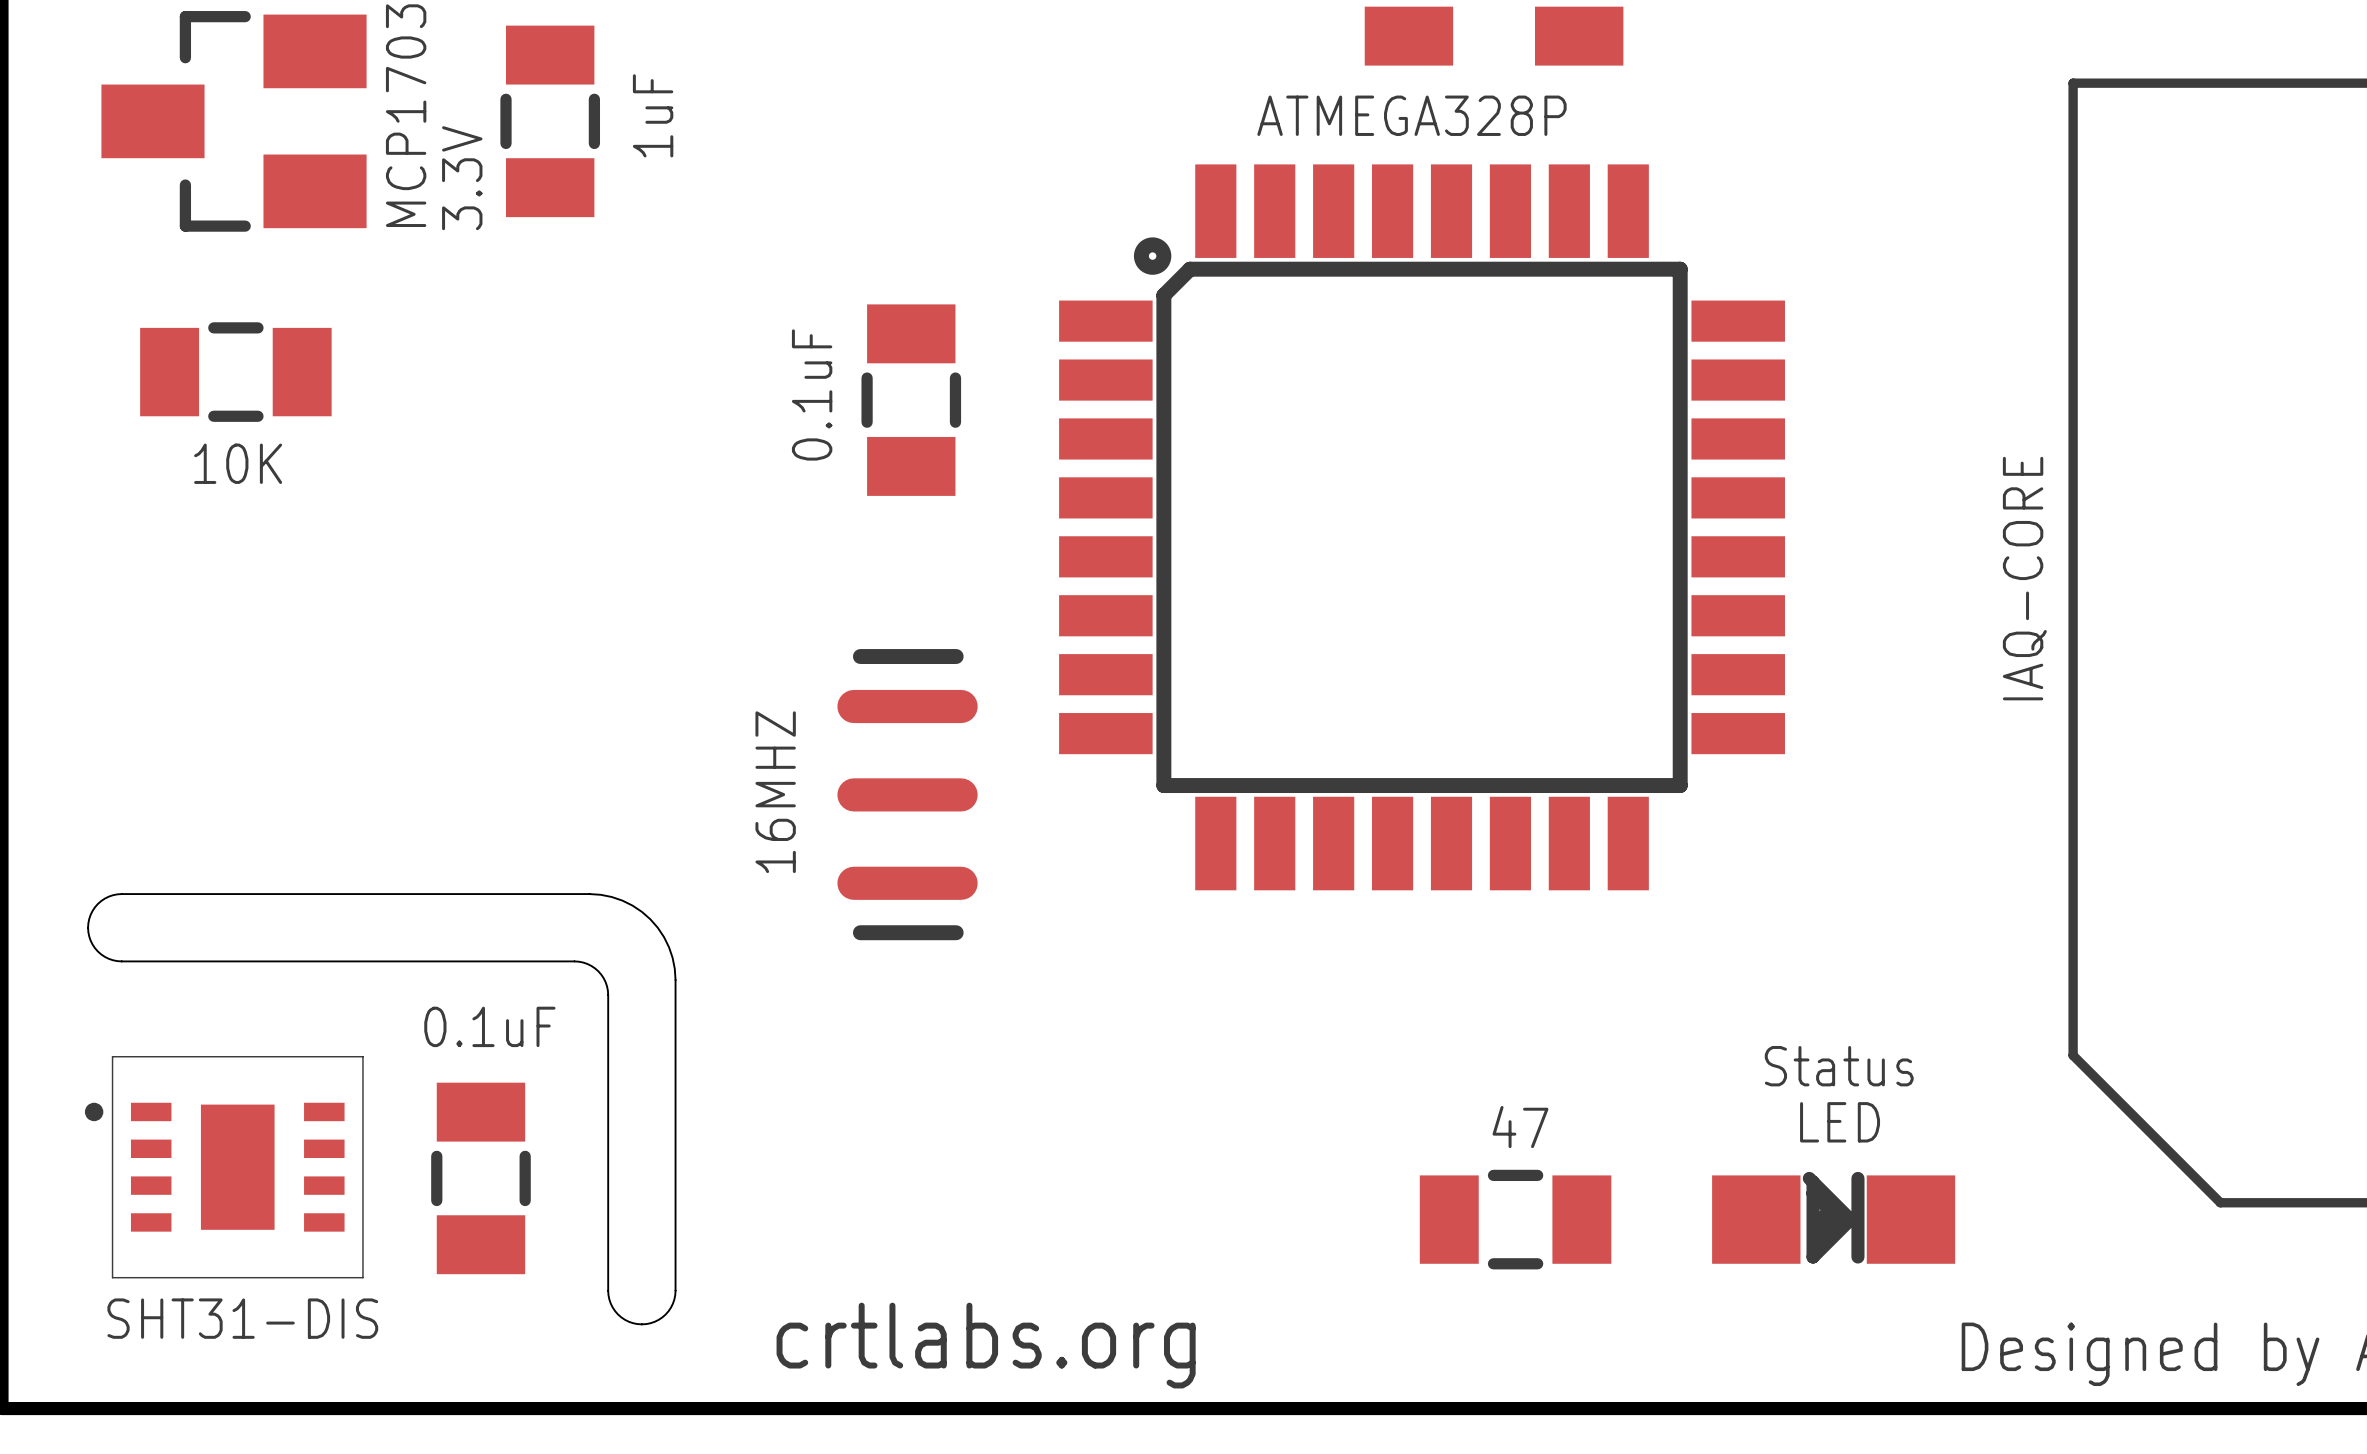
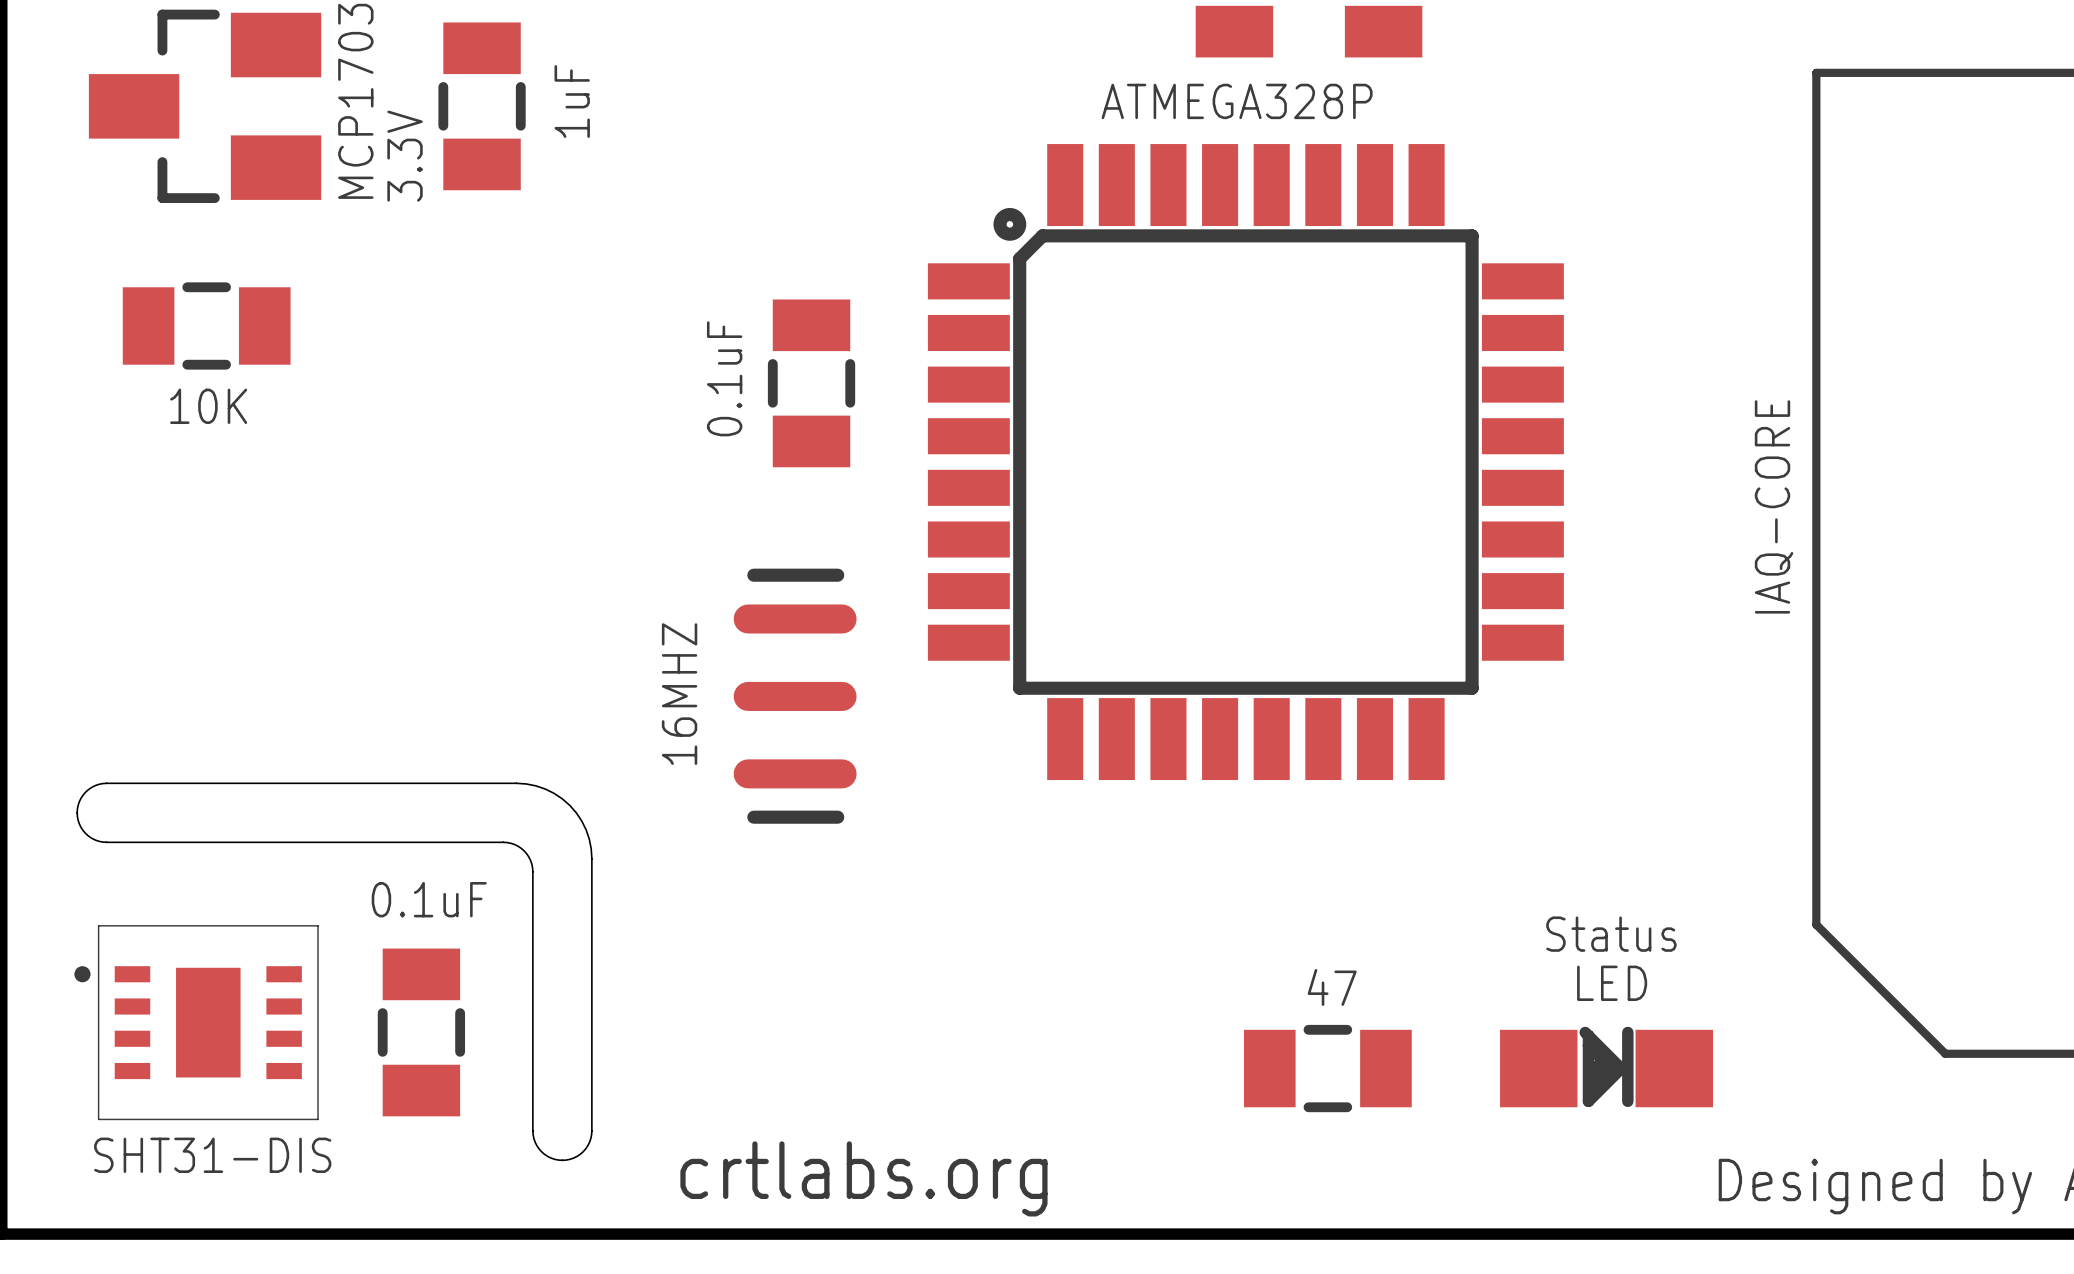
part position: (911, 400) -> (811, 383)

